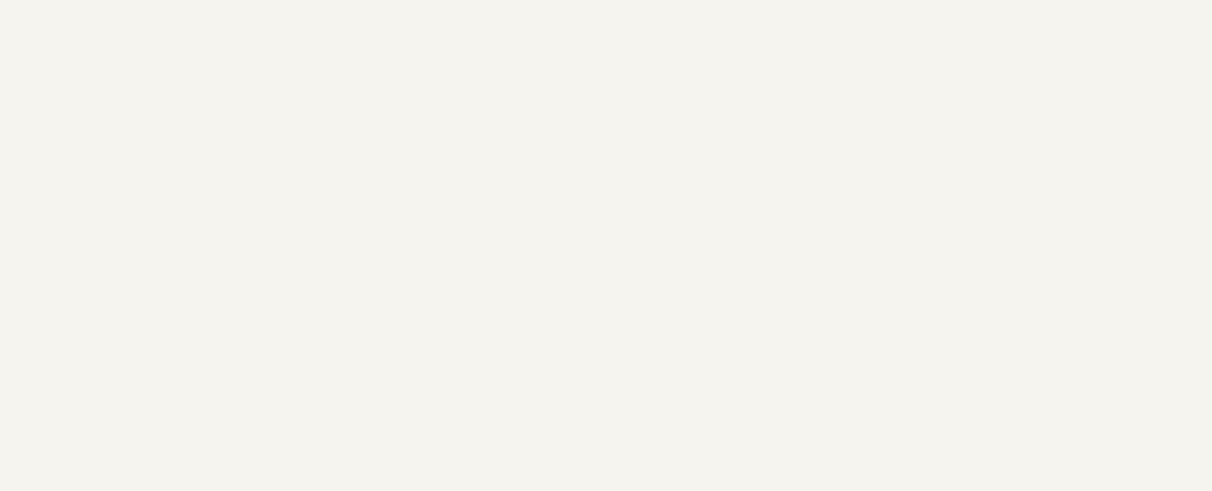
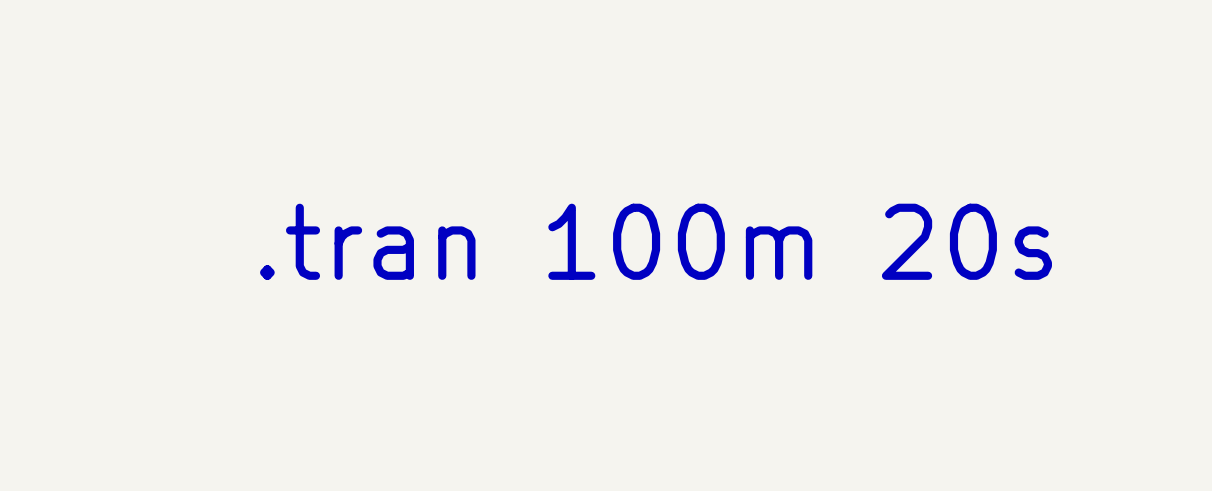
text: none -> .tran 100m 20s (656, 241)

